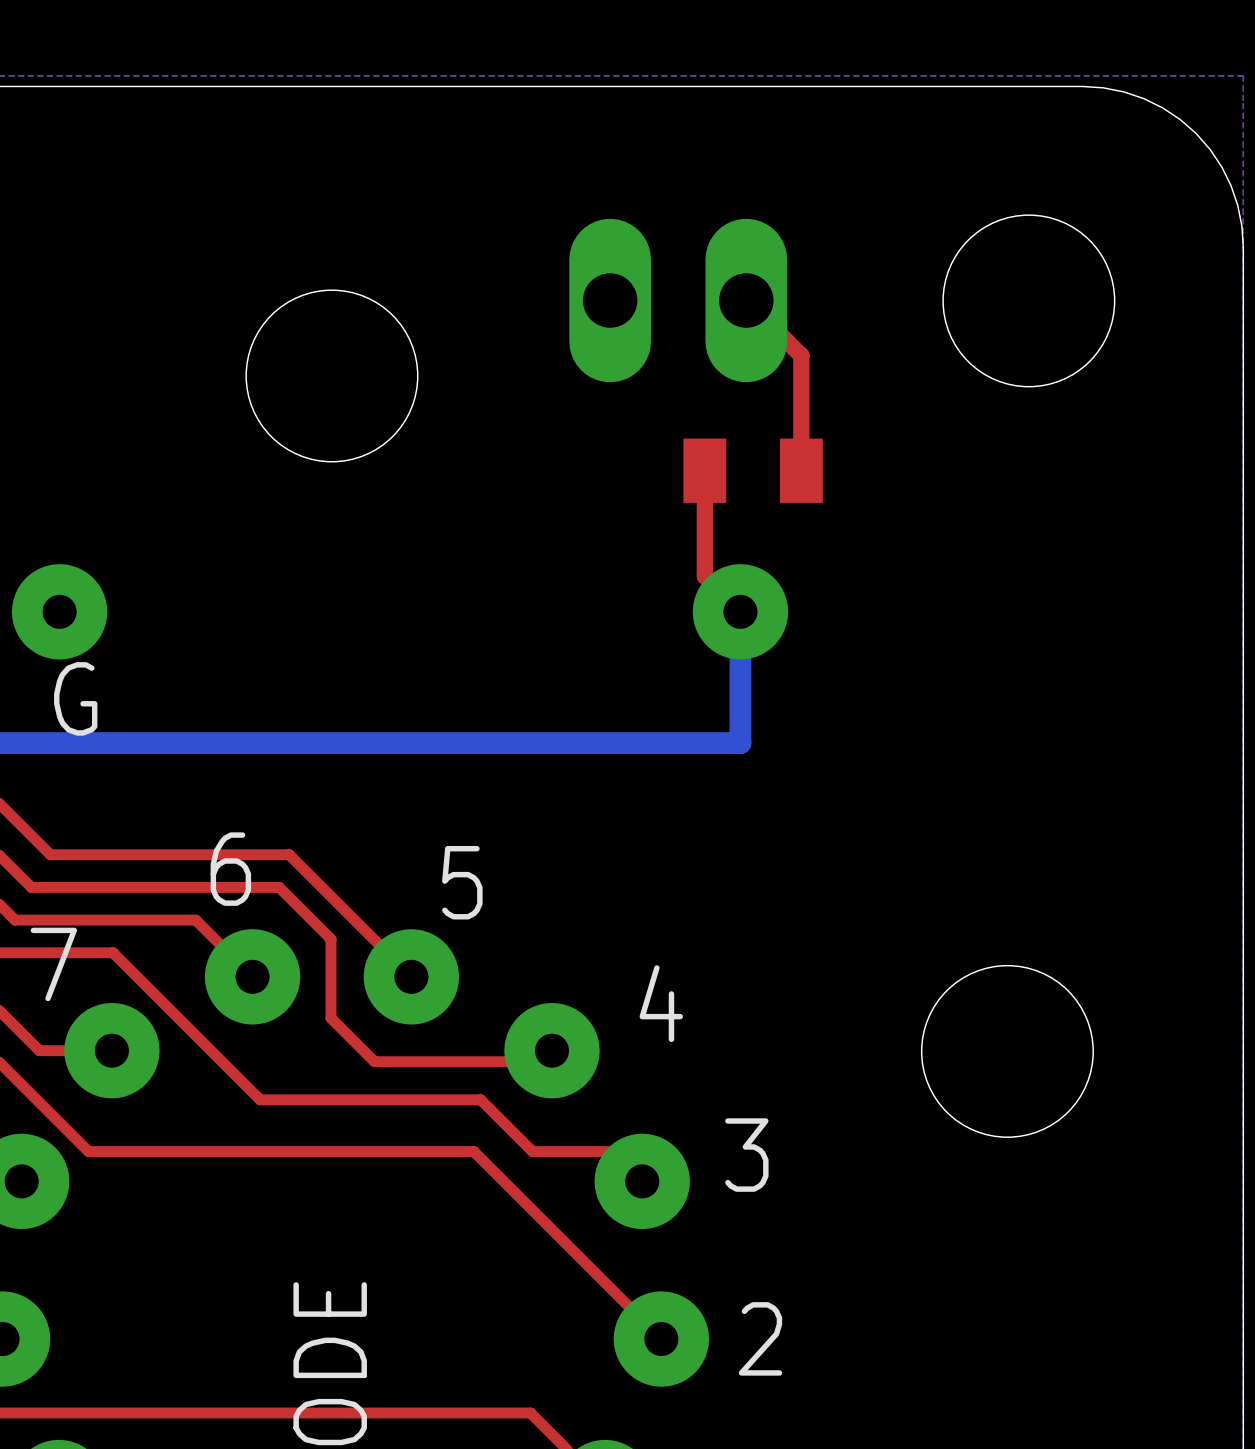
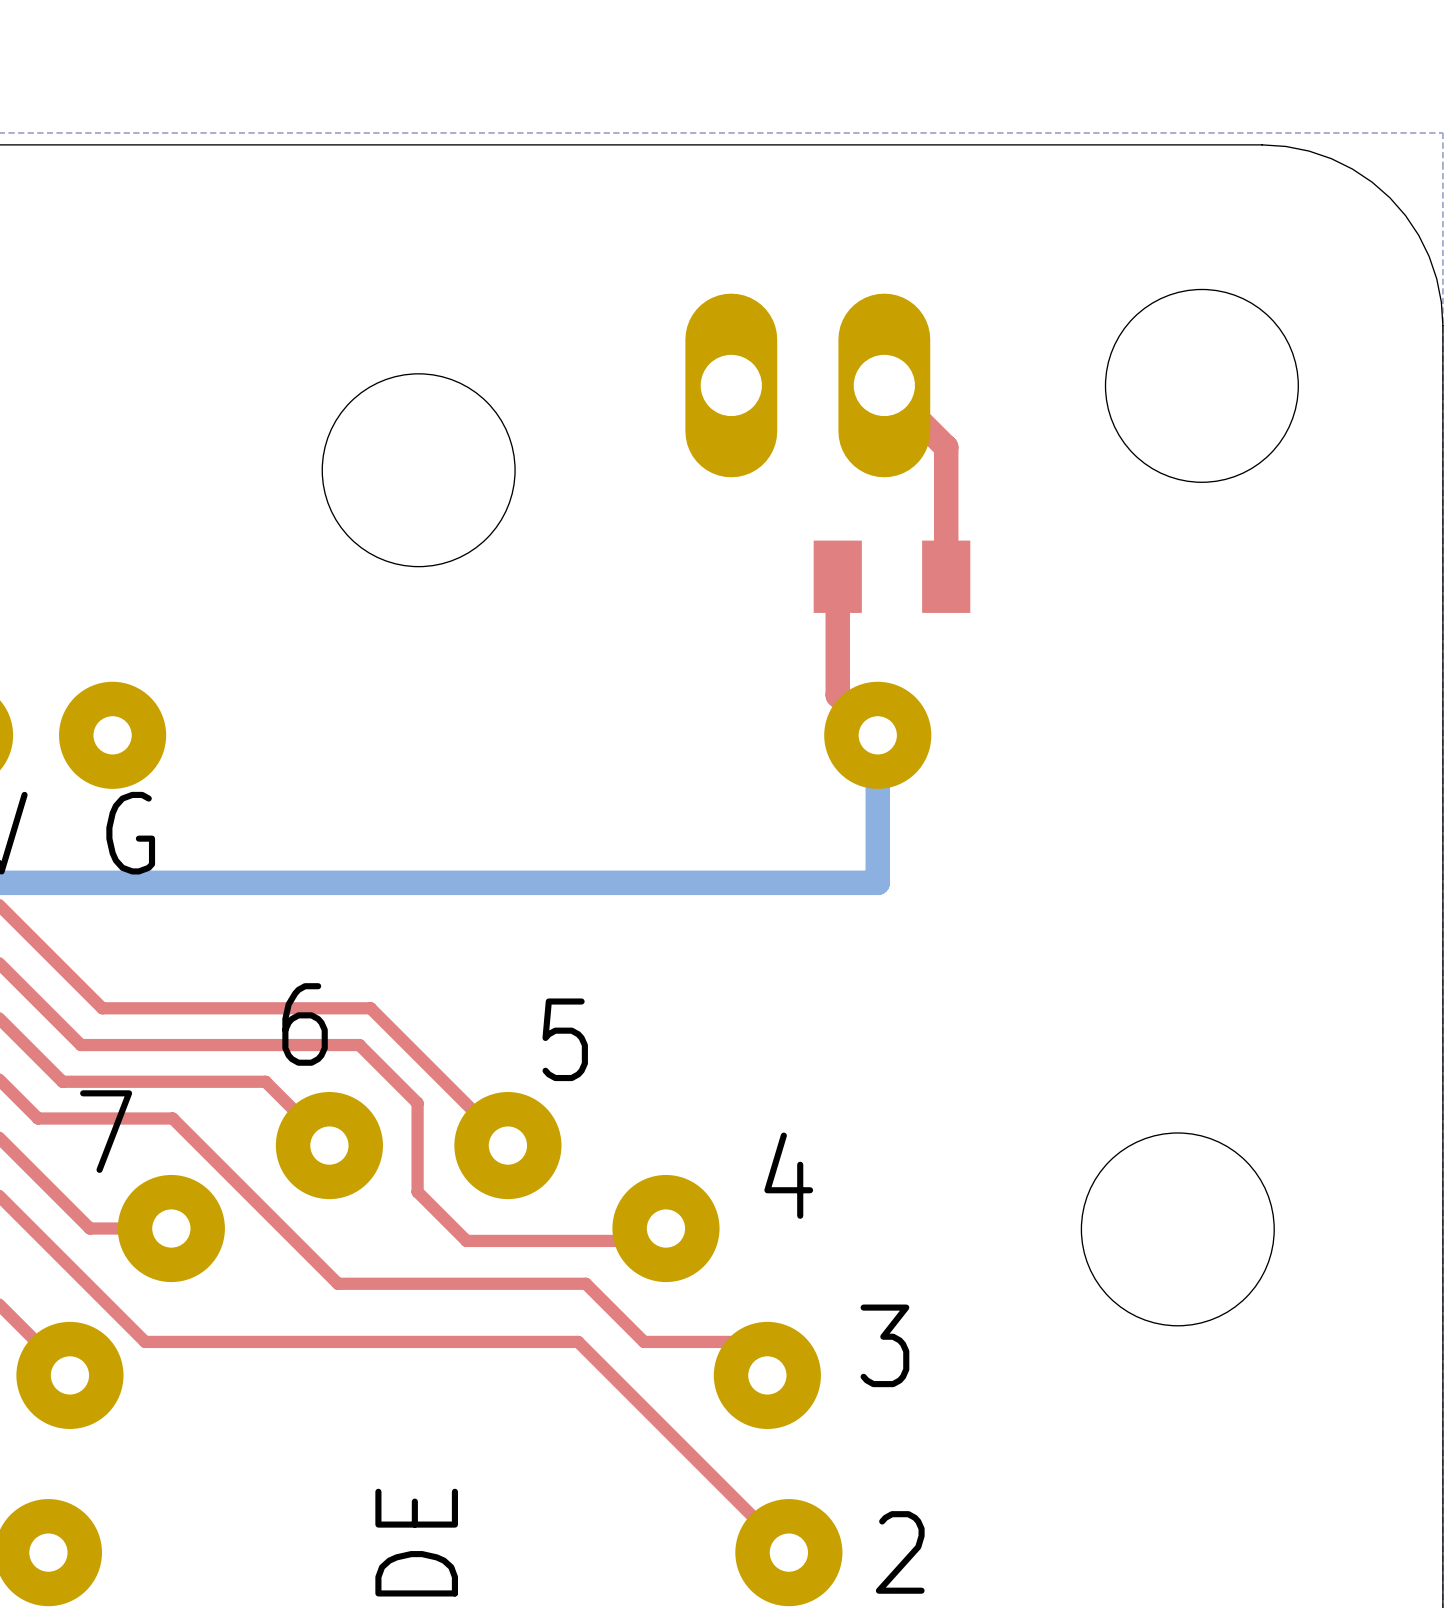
top track width: thin (746, 300) (801, 355) (801, 470) -> thick (884, 385) (946, 447) (946, 576)
top track width: thin (704, 470) (704, 576) (740, 611) -> thick (837, 576) (837, 695) (877, 735)

